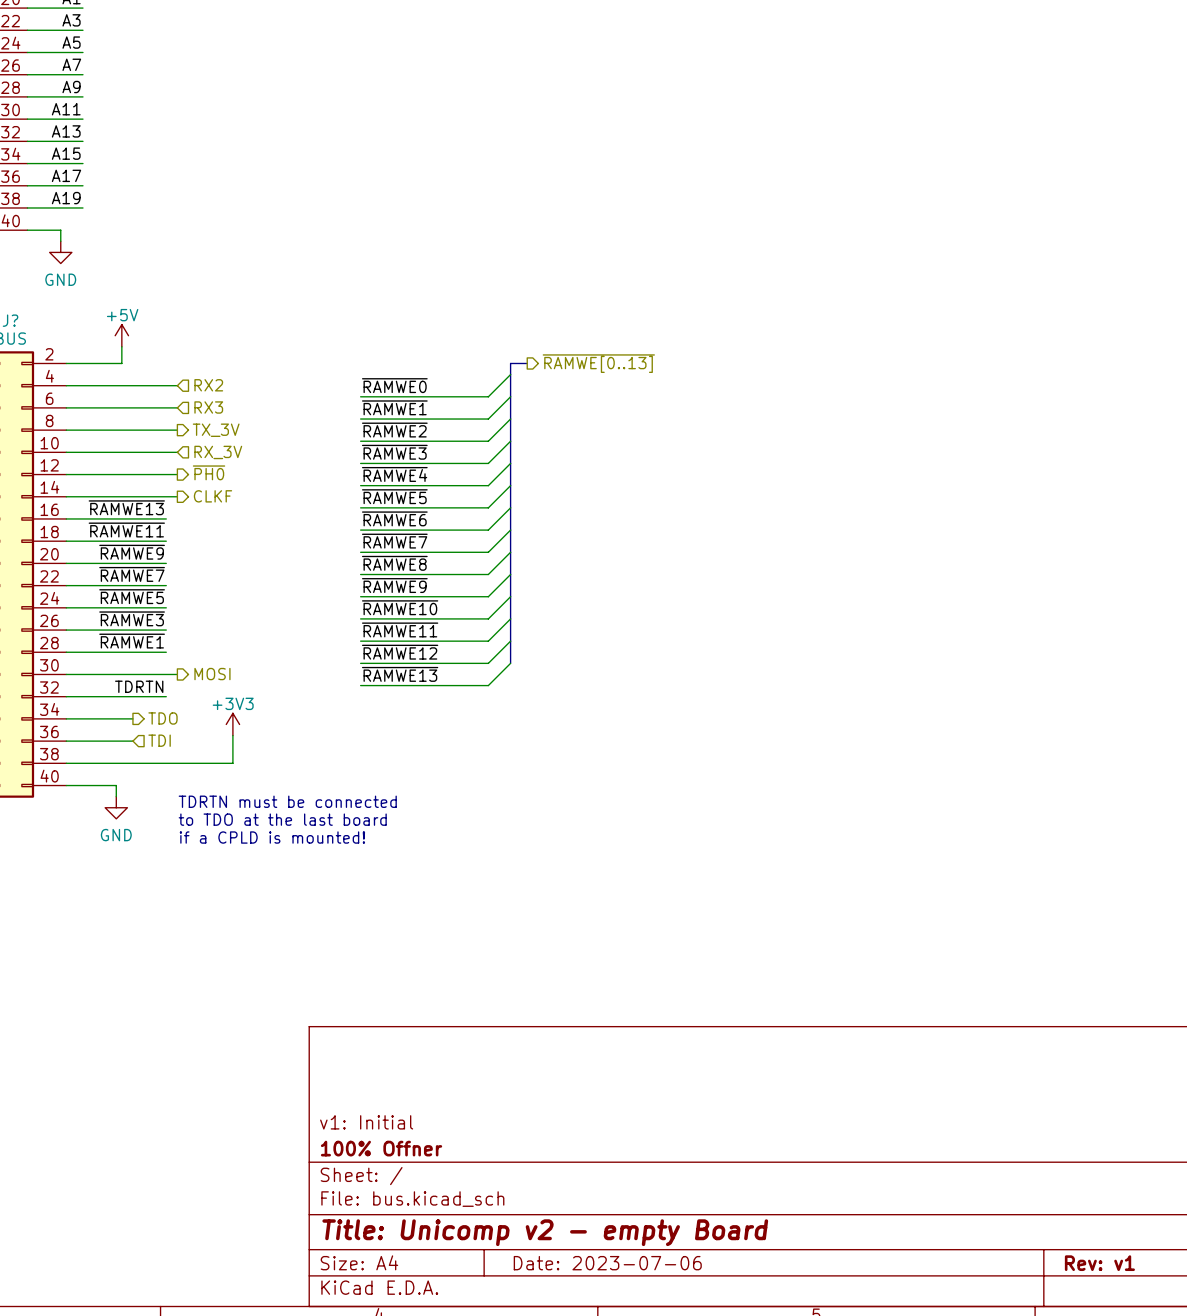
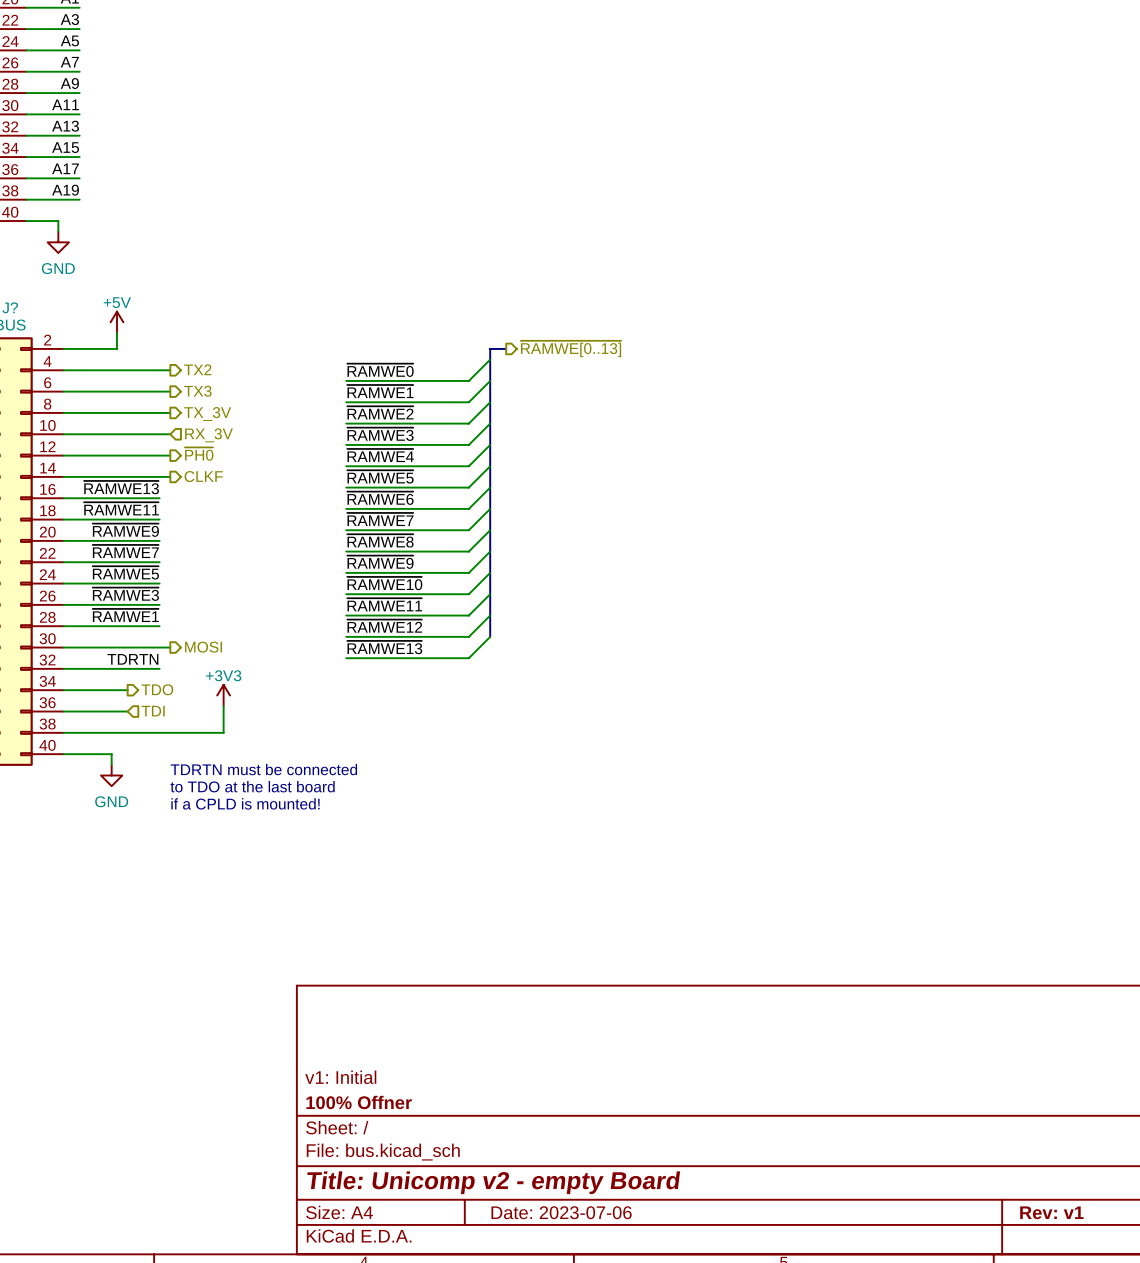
hierarchical label shape: input (208, 385) -> output (197, 369)
hierarchical label: RX2 (208, 385) -> TX2 (197, 369)
hierarchical label shape: input (208, 407) -> output (197, 391)
hierarchical label: RX3 (208, 407) -> TX3 (197, 391)

